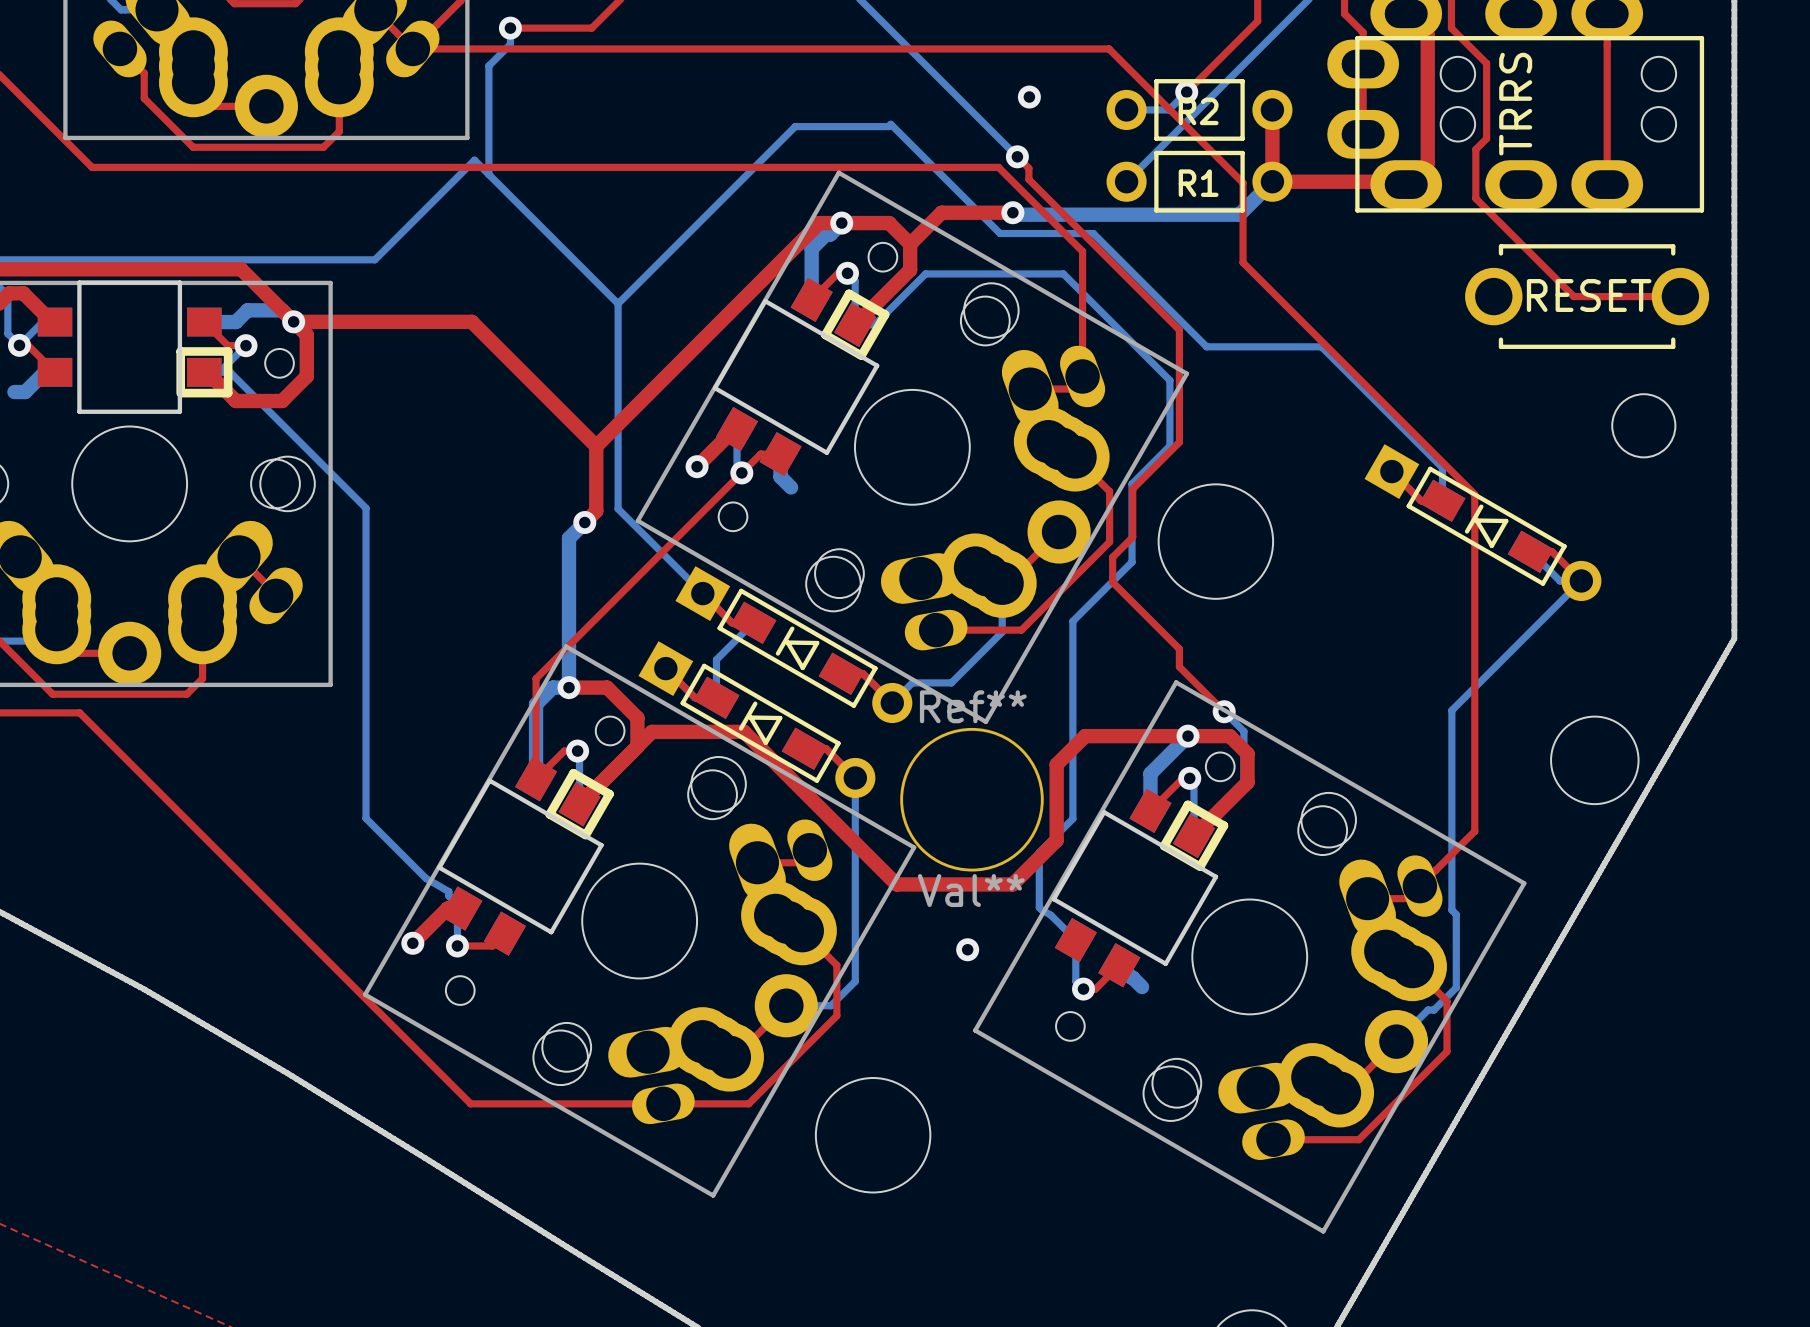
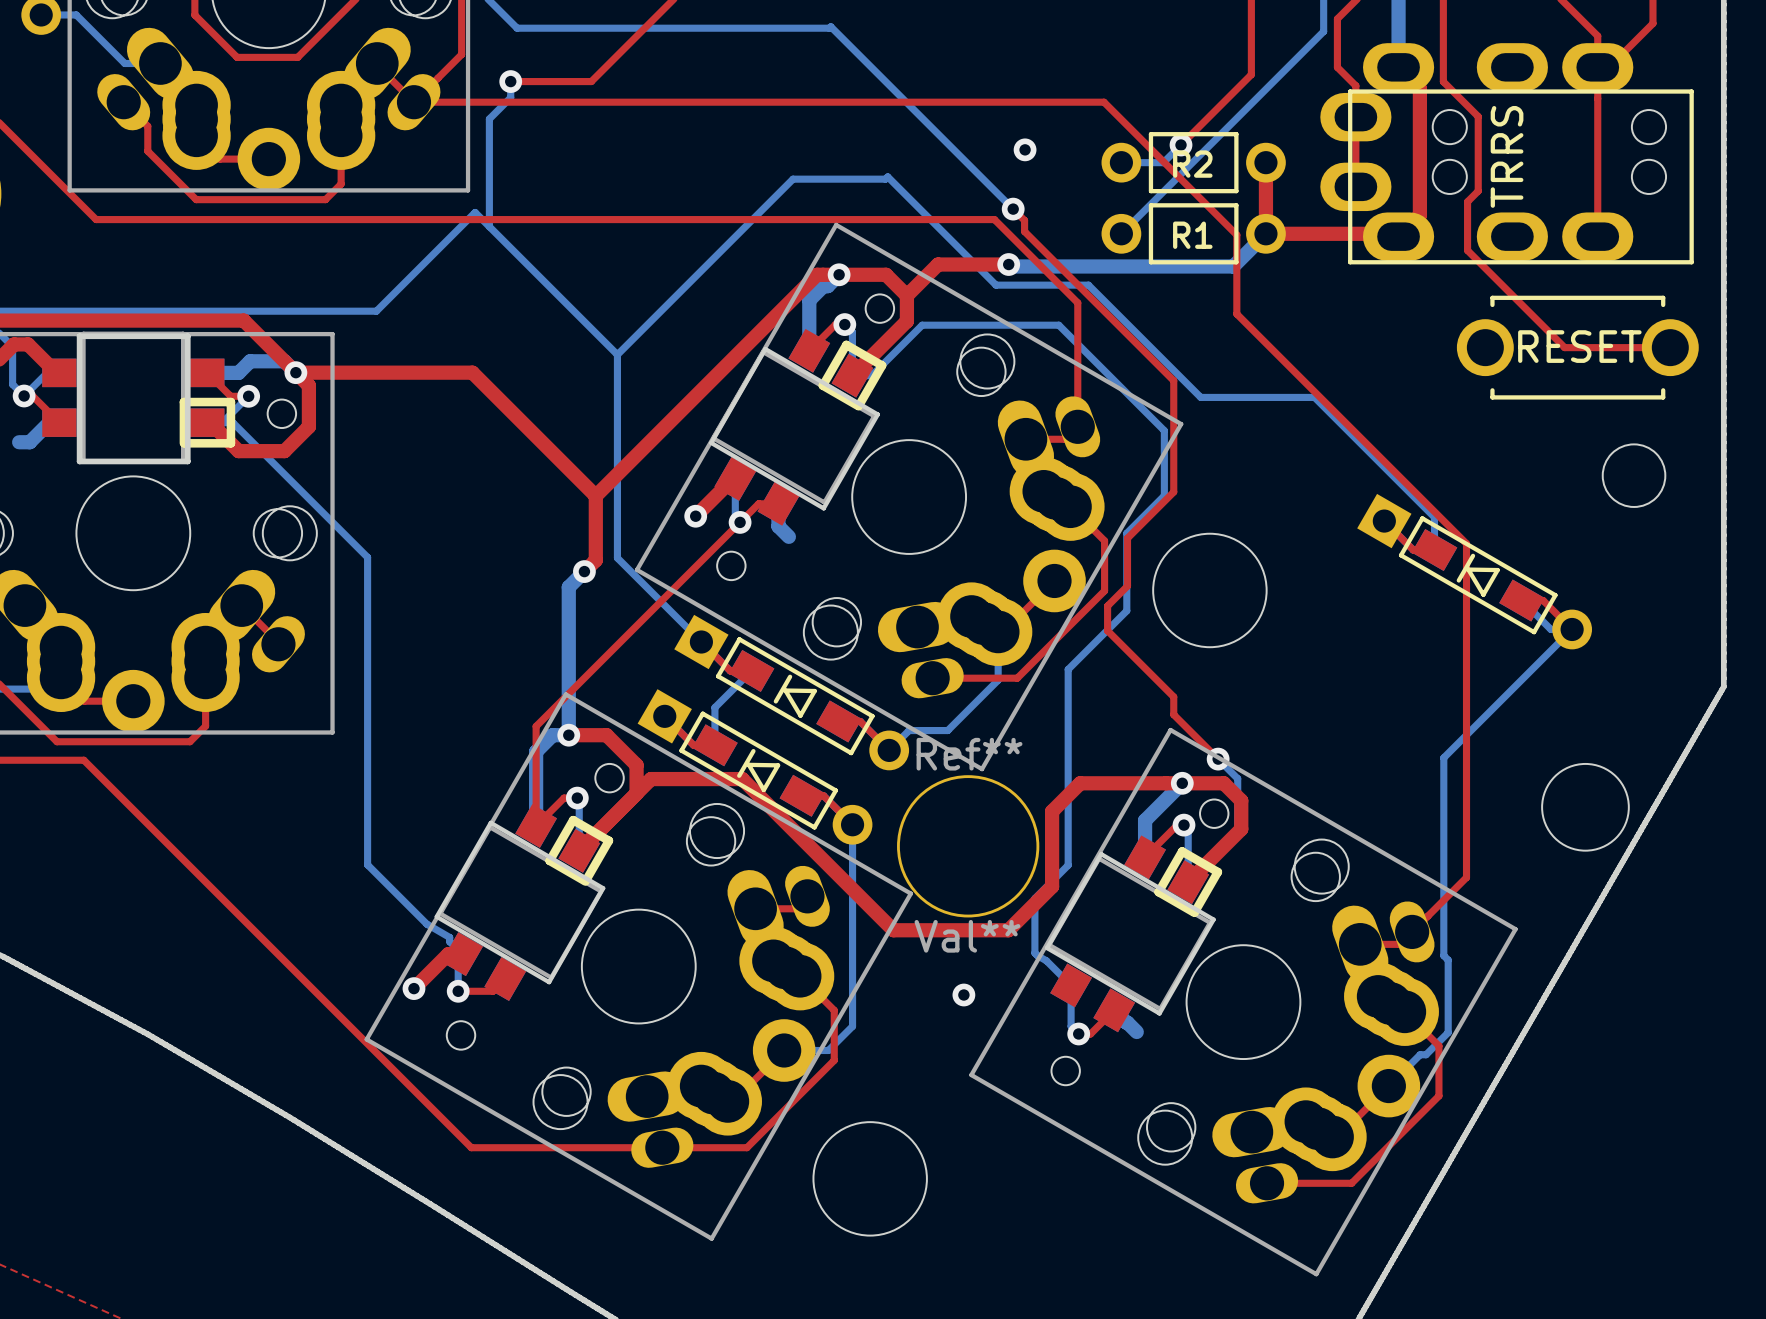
part footprint: [712, 277, 890, 477] -> [711, 328, 887, 526]
part footprint: [37, 280, 233, 414] -> [42, 331, 236, 464]
board edge: none -> (79, 336) (187, 336) (187, 461) (79, 461) (79, 336)
board edge: none -> (765, 349) (877, 414) (823, 508) (711, 442) (765, 349)
part footprint: [437, 757, 614, 956] -> [438, 804, 614, 1001]
board edge: none -> (490, 822) (436, 916) (549, 982) (603, 888) (490, 822)
part footprint: [1051, 788, 1229, 988] -> [1047, 835, 1223, 1033]
board edge: none -> (1101, 854) (1213, 919) (1159, 1013) (1047, 948) (1101, 854)

